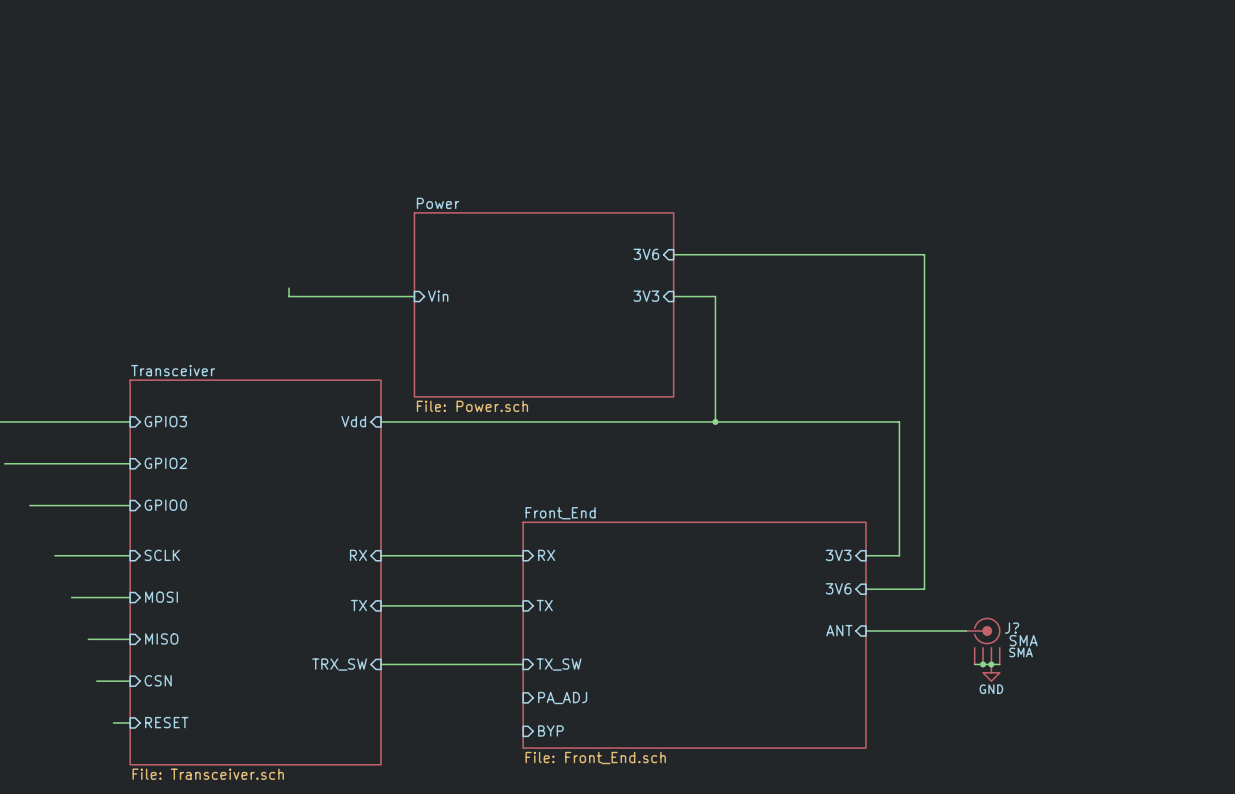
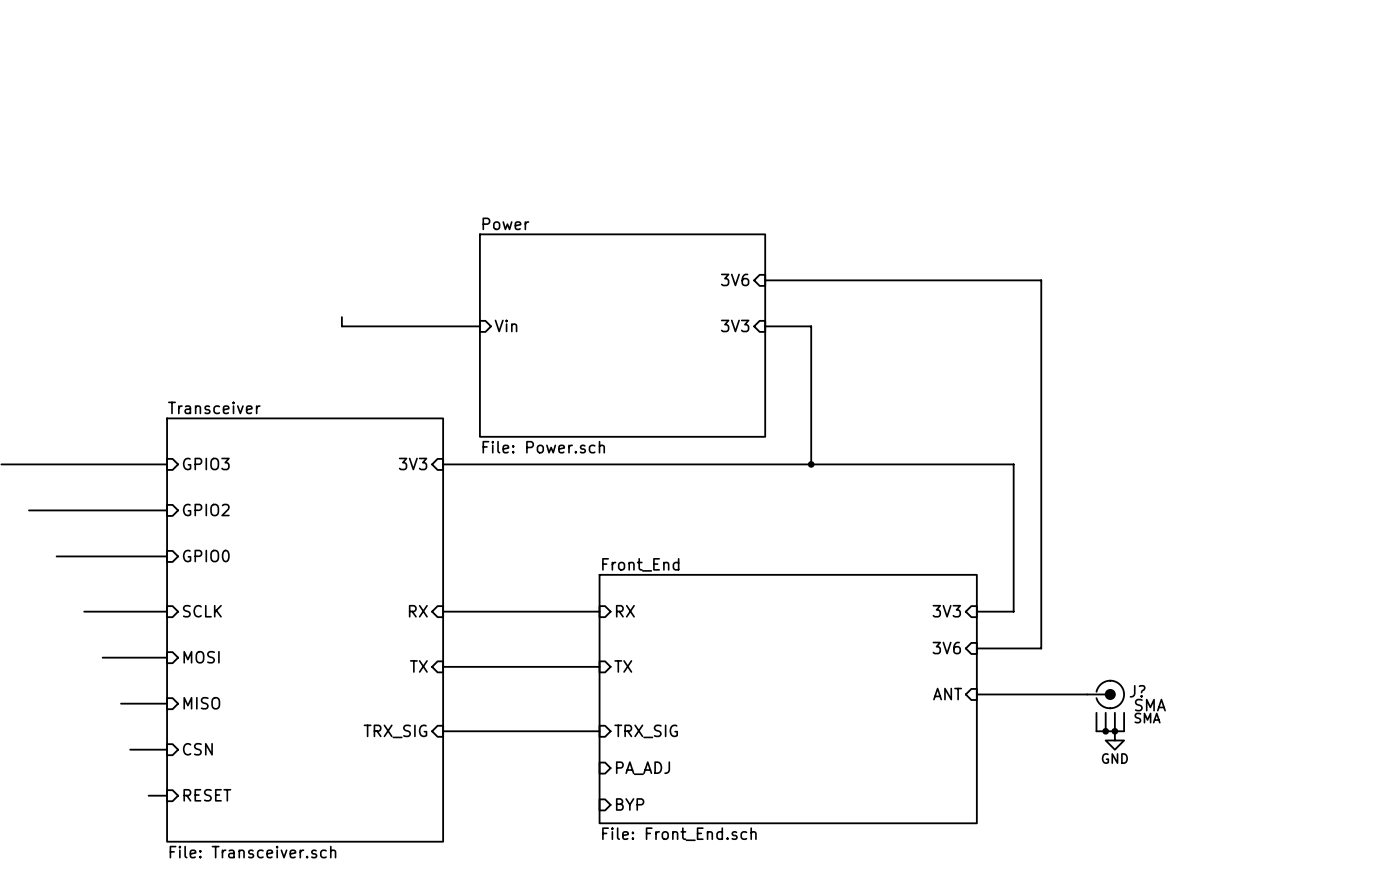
sheet pin: Vdd (353, 421) -> 3V3 (413, 464)
sheet pin: TRX_SW (339, 664) -> TRX_SIG (395, 731)
sheet pin: TX_SW (559, 664) -> TRX_SIG (646, 731)

